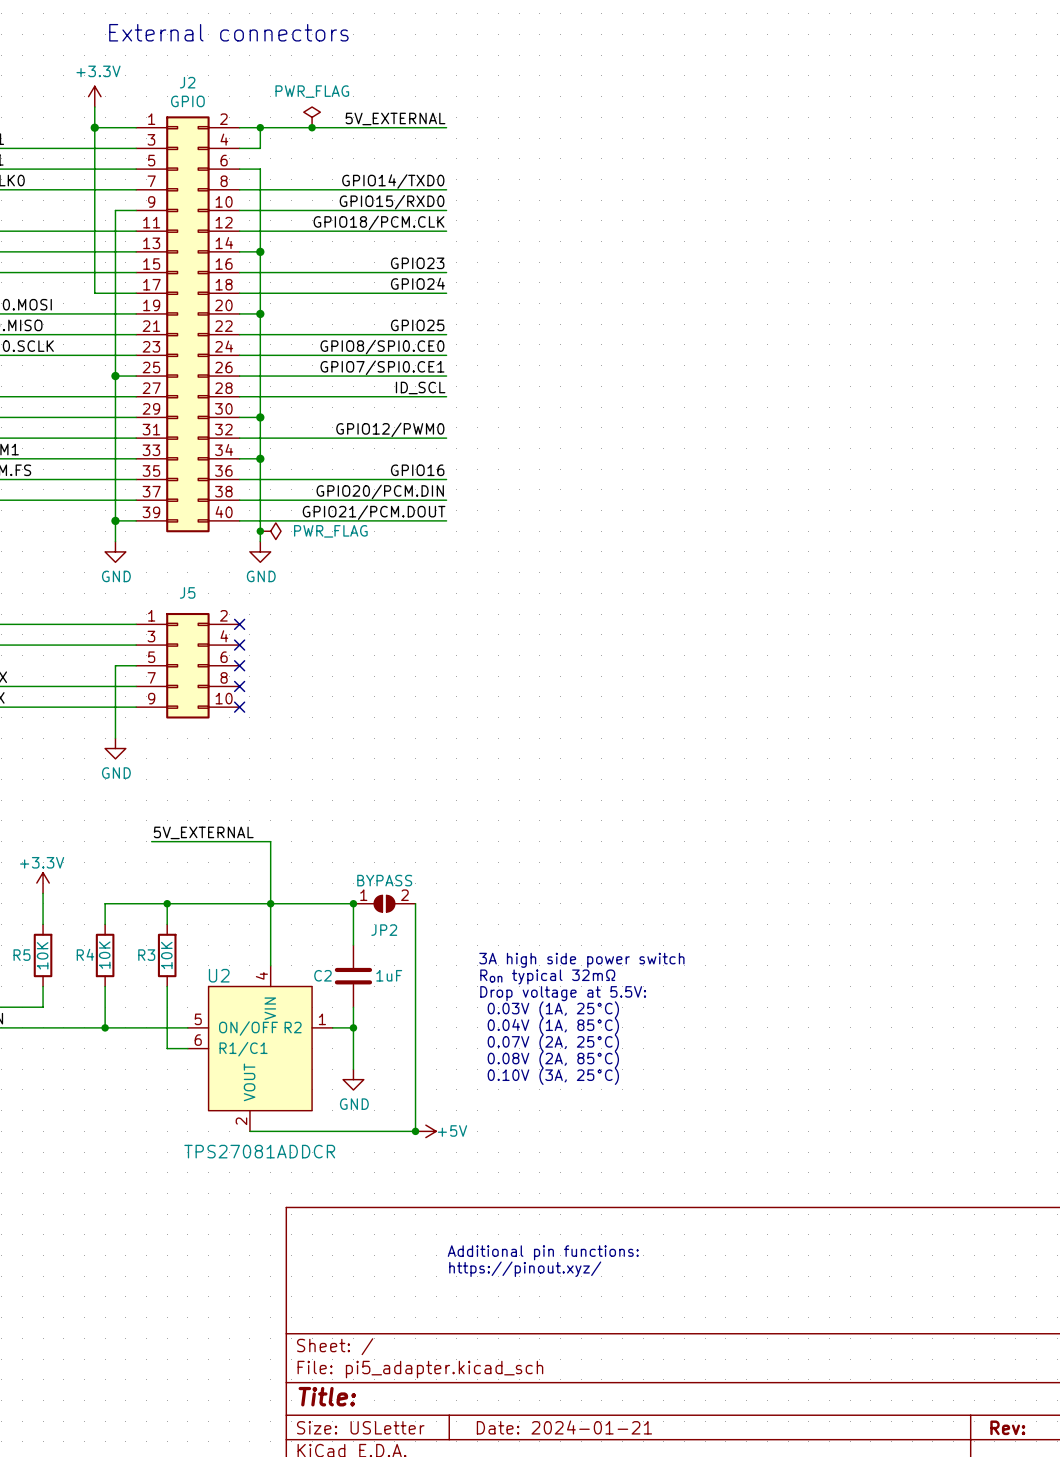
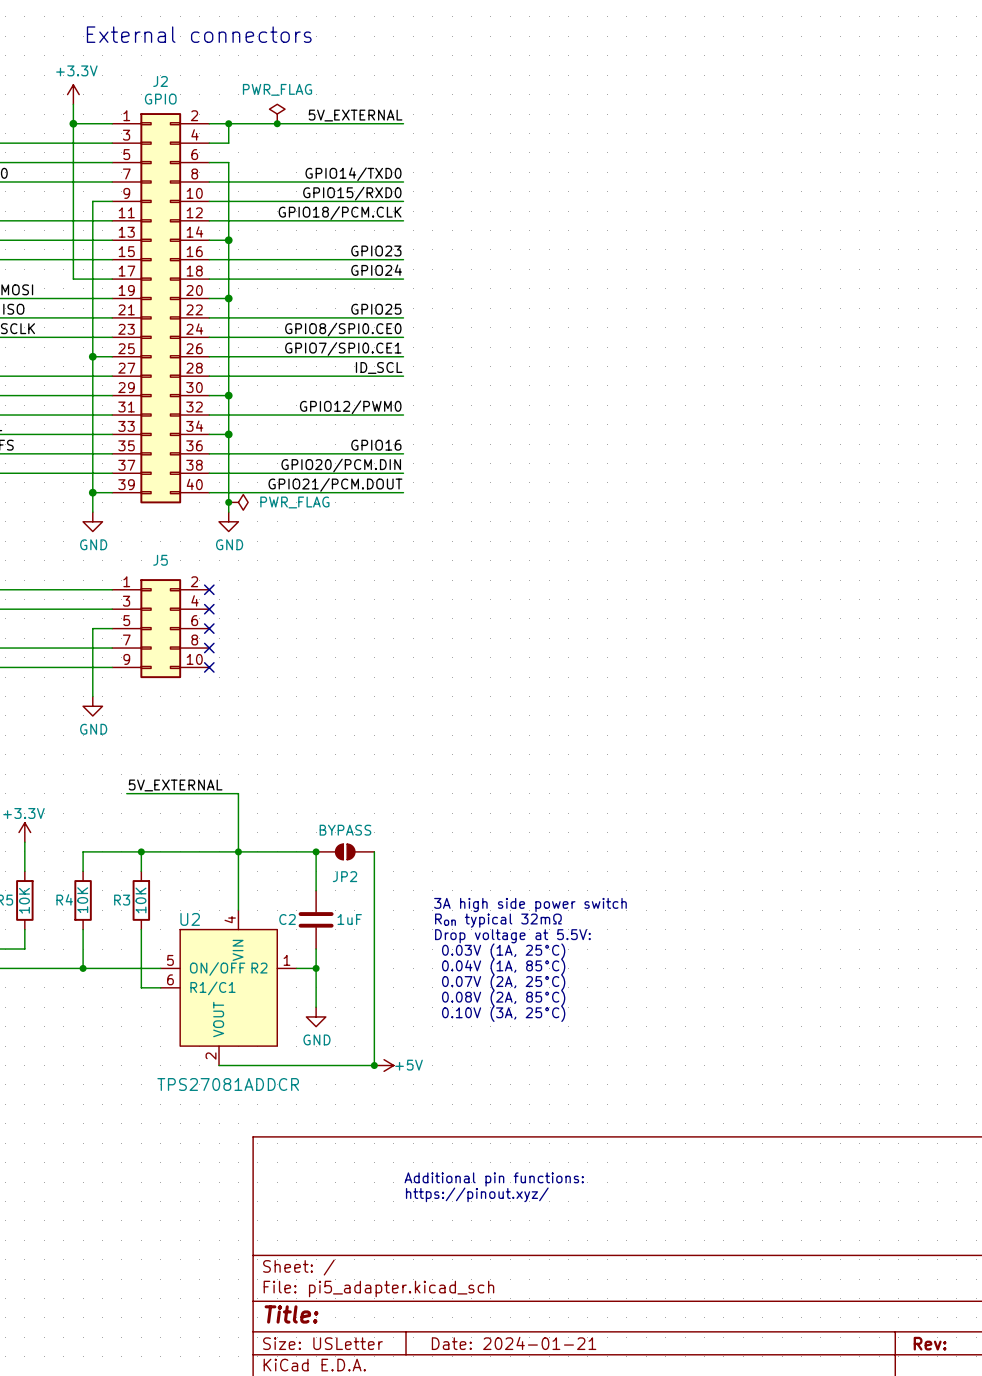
JP2 pin number: 1 (363, 895) -> none
JP2 pin number: 2 (404, 895) -> none

